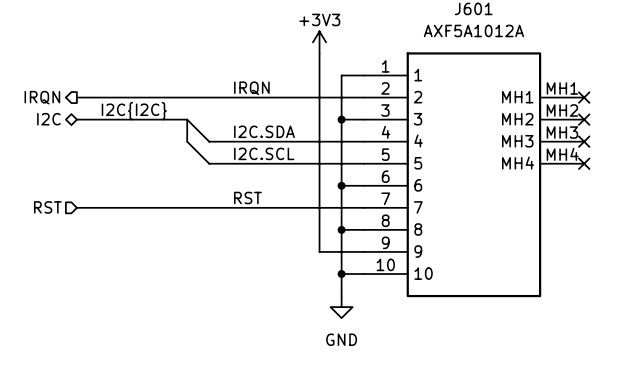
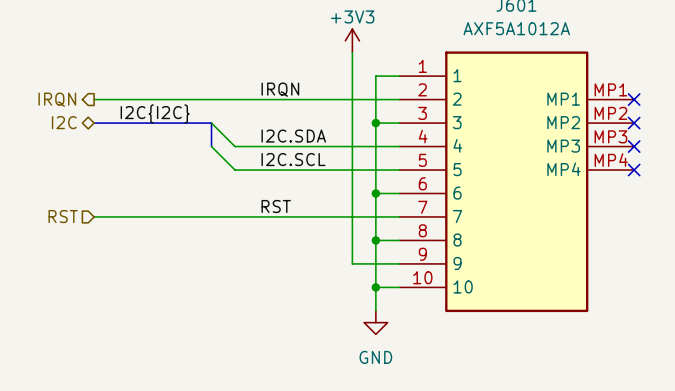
J601 pin number: MH1 (562, 88) -> MP1 (610, 89)
J601 pin name: MH1 (517, 97) -> MP1 (563, 99)
J601 pin number: MH2 (562, 110) -> MP2 (610, 113)
J601 pin name: MH2 (517, 119) -> MP2 (563, 122)
J601 pin number: MH3 (562, 132) -> MP3 (610, 136)
J601 pin name: MH3 (517, 141) -> MP3 (563, 146)
J601 pin number: MH4 (562, 154) -> MP4 (611, 160)
J601 pin name: MH4 (518, 163) -> MP4 (563, 169)

